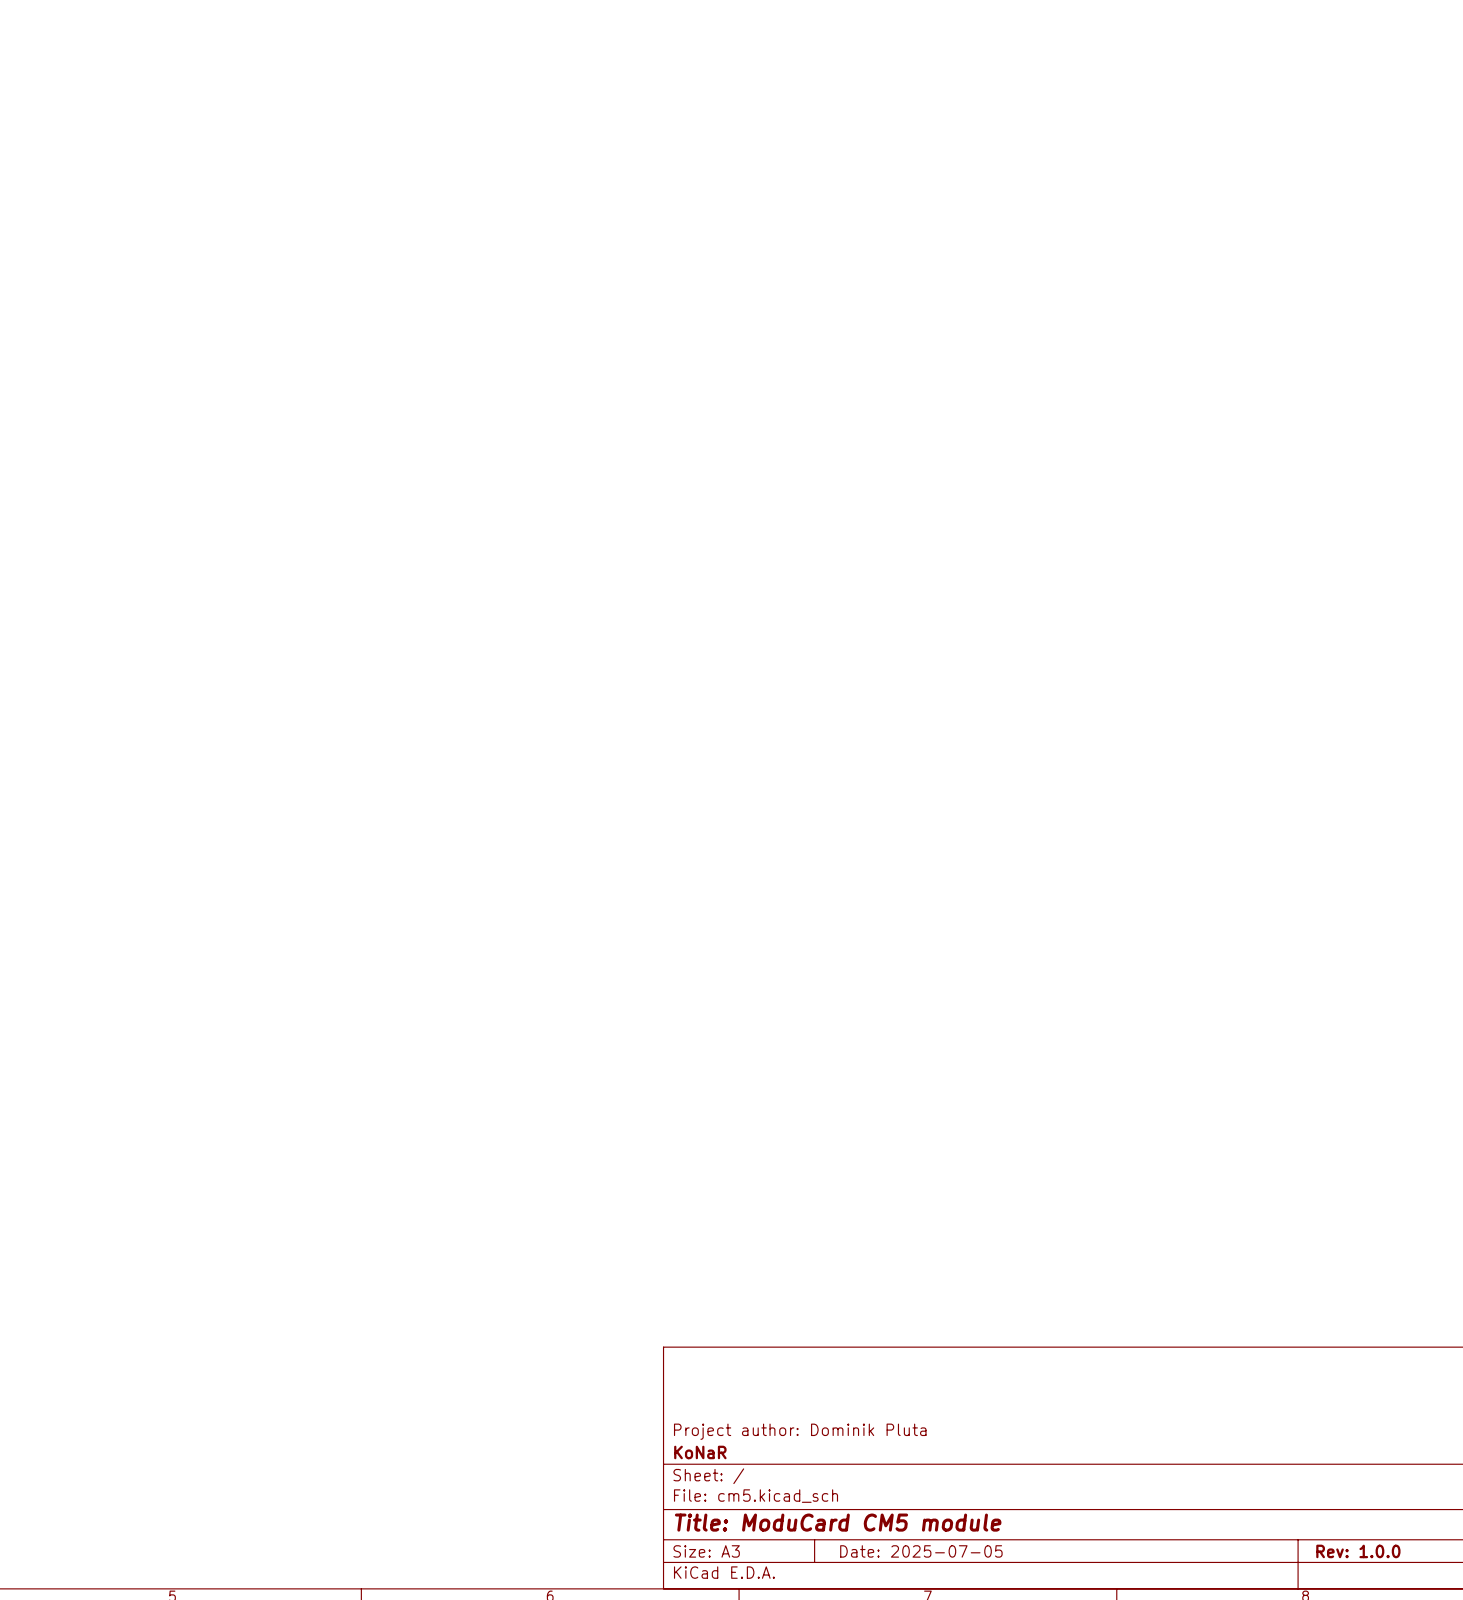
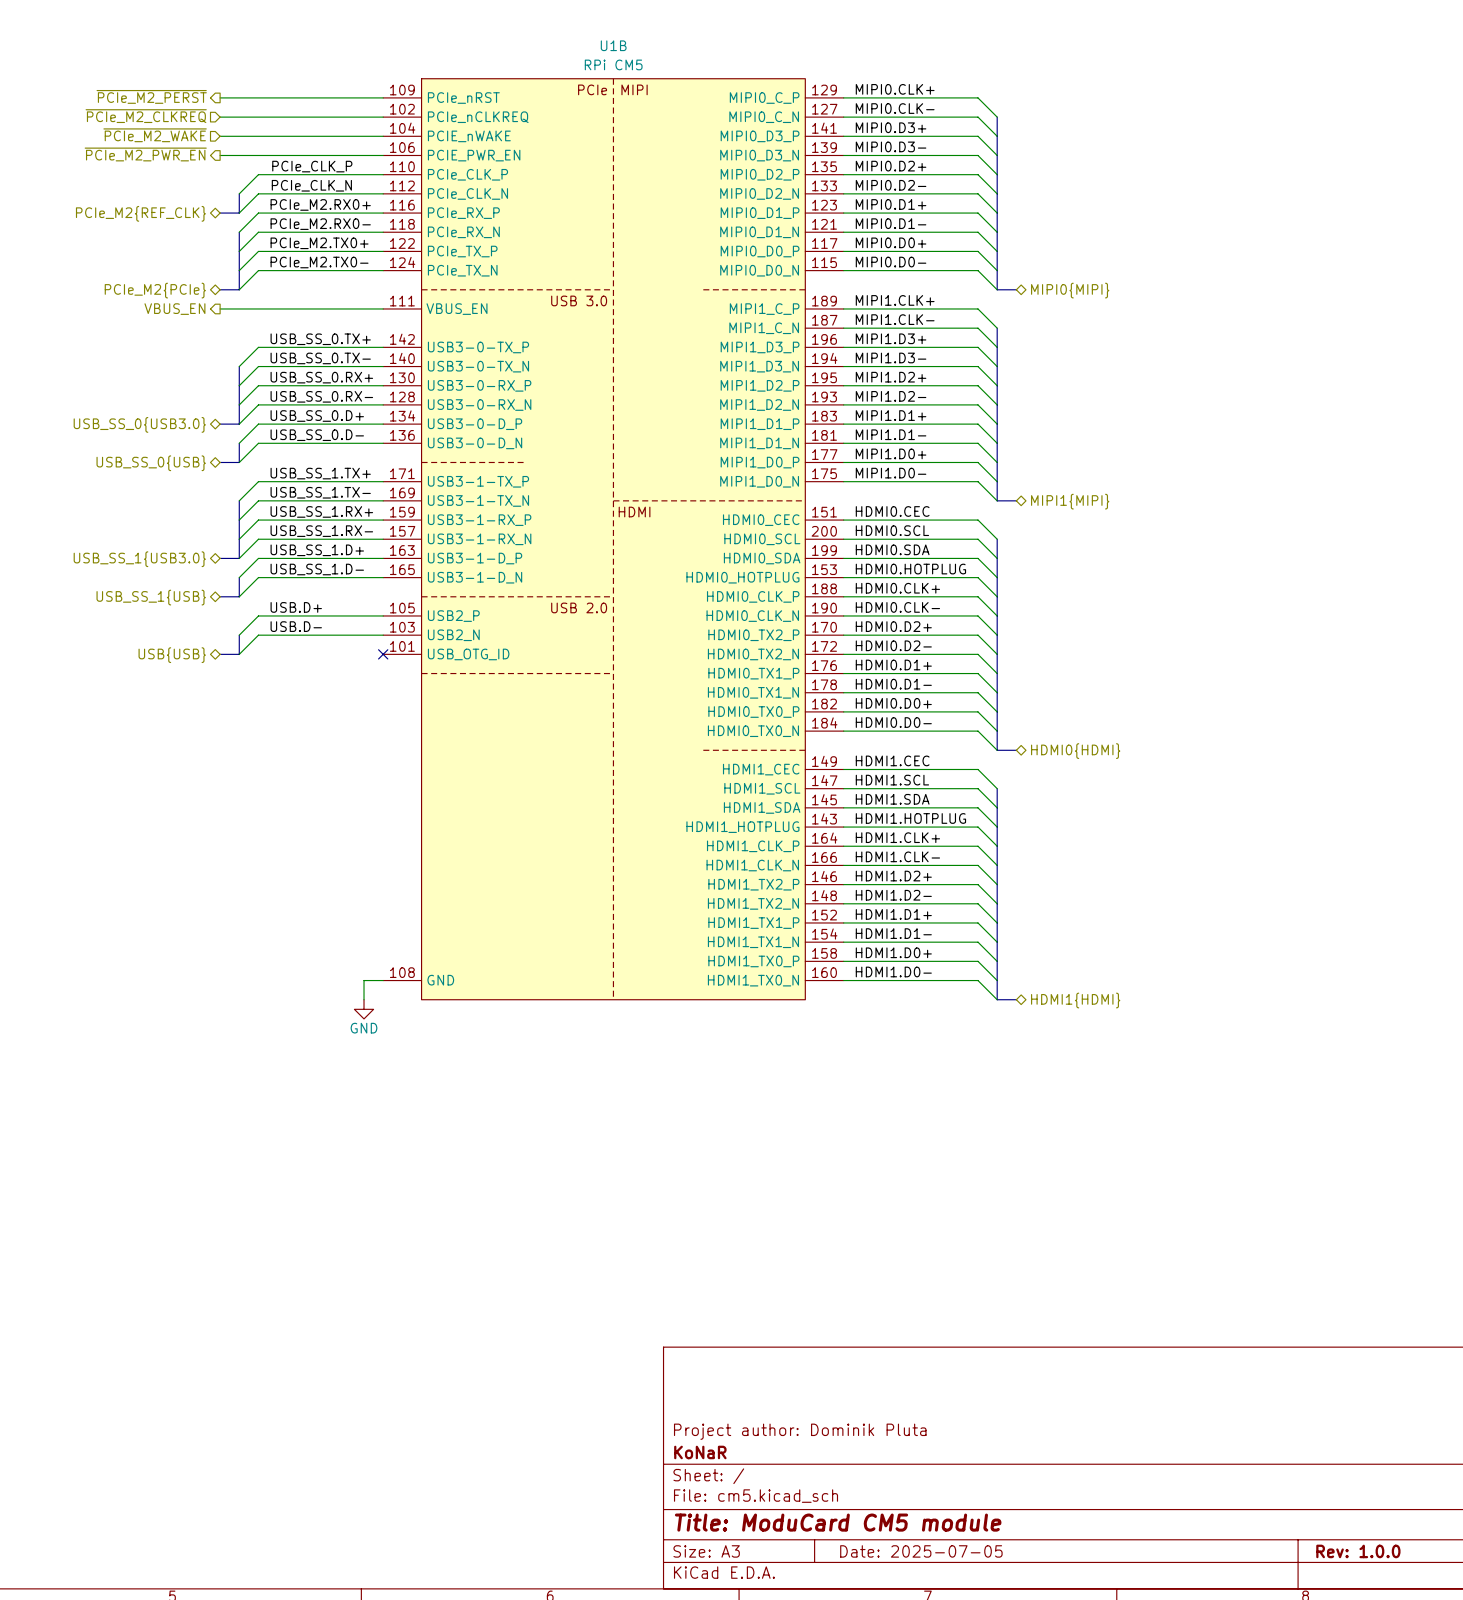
label: none -> MIPI0.CLK+ (895, 89)
hierarchical label: none -> ~{PCIe_M2_PERST} (151, 96)
wire: none -> (220, 97) (383, 97)
wire: none -> (843, 97) (978, 97) (997, 117)
label: none -> MIPI0.CLK- (895, 108)
hierarchical label: none -> ~{PCIe_M2_CLKREQ} (146, 116)
wire: none -> (220, 117) (383, 117)
wire: none -> (843, 117) (978, 117) (997, 136)
bus: none -> (997, 117) (997, 289) (1016, 289)
label: none -> MIPI0.D3+ (891, 127)
hierarchical label: none -> ~{PCIe_M2_WAKE} (155, 135)
wire: none -> (220, 136) (383, 136)
wire: none -> (843, 136) (978, 136) (997, 155)
label: none -> MIPI0.D3- (891, 146)
hierarchical label: none -> ~{PCIe_M2_PWR_EN} (145, 154)
wire: none -> (220, 155) (383, 155)
wire: none -> (843, 155) (978, 155) (997, 174)
label: none -> PCIe_CLK_P (312, 166)
label: none -> MIPI0.D2+ (891, 166)
wire: none -> (383, 174) (258, 174) (239, 193)
wire: none -> (843, 174) (978, 174) (997, 193)
label: none -> PCIe_CLK_N (311, 185)
label: none -> MIPI0.D2- (891, 185)
bus: none -> (239, 193) (239, 213) (220, 213)
wire: none -> (383, 193) (258, 193) (239, 213)
wire: none -> (843, 193) (978, 193) (997, 213)
label: none -> PCIe_M2.RX0+ (320, 204)
label: none -> MIPI0.D1+ (891, 204)
hierarchical label: none -> PCIe_M2{REF_CLK} (140, 213)
wire: none -> (383, 213) (258, 213) (239, 232)
wire: none -> (843, 213) (978, 213) (997, 232)
label: none -> MIPI0.D1- (891, 223)
label: none -> PCIe_M2.RX0- (320, 224)
bus: none -> (239, 232) (239, 289) (220, 289)
wire: none -> (383, 232) (258, 232) (239, 251)
wire: none -> (843, 232) (978, 232) (997, 251)
label: none -> MIPI0.D0+ (891, 242)
label: none -> PCIe_M2.TX0+ (319, 243)
wire: none -> (383, 251) (258, 251) (239, 270)
wire: none -> (843, 251) (978, 251) (997, 270)
label: none -> PCIe_M2.TX0- (319, 262)
label: none -> MIPI0.D0- (891, 262)
wire: none -> (383, 270) (258, 270) (239, 289)
wire: none -> (843, 270) (978, 270) (997, 289)
hierarchical label: none -> PCIe_M2{PCIe} (155, 290)
hierarchical label: none -> MIPI0{MIPI} (1070, 290)
label: none -> MIPI1.CLK+ (895, 300)
wire: none -> (220, 308) (383, 308)
wire: none -> (843, 308) (978, 308) (997, 328)
hierarchical label: none -> VBUS_EN (174, 309)
label: none -> MIPI1.CLK- (895, 319)
wire: none -> (843, 328) (978, 328) (997, 347)
bus: none -> (997, 328) (997, 500) (1016, 500)
label: none -> MIPI1.D3+ (891, 338)
label: none -> USB_SS_0.TX+ (320, 339)
wire: none -> (383, 347) (258, 347) (239, 366)
wire: none -> (843, 347) (978, 347) (997, 366)
label: none -> MIPI1.D3- (891, 357)
label: none -> USB_SS_0.TX- (320, 358)
bus: none -> (239, 366) (239, 424) (220, 424)
wire: none -> (383, 366) (258, 366) (239, 385)
wire: none -> (843, 366) (978, 366) (997, 385)
label: none -> USB_SS_0.RX+ (321, 377)
label: none -> MIPI1.D2+ (891, 377)
wire: none -> (383, 385) (258, 385) (239, 404)
wire: none -> (843, 385) (978, 385) (997, 404)
label: none -> USB_SS_0.RX- (321, 396)
label: none -> MIPI1.D2- (891, 396)
wire: none -> (383, 404) (258, 404) (239, 424)
wire: none -> (843, 404) (978, 404) (997, 424)
label: none -> MIPI1.D1+ (891, 415)
label: none -> USB_SS_0.D+ (317, 416)
hierarchical label: none -> USB_SS_0{USB3.0} (139, 424)
wire: none -> (383, 424) (258, 424) (239, 443)
wire: none -> (843, 424) (978, 424) (997, 443)
label: none -> MIPI1.D1- (891, 434)
label: none -> USB_SS_0.D- (317, 435)
bus: none -> (239, 443) (239, 462) (220, 462)
wire: none -> (383, 443) (258, 443) (239, 462)
wire: none -> (843, 443) (978, 443) (997, 462)
label: none -> MIPI1.D0+ (891, 453)
wire: none -> (843, 462) (978, 462) (997, 481)
hierarchical label: none -> USB_SS_0{USB} (151, 463)
label: none -> USB_SS_1.TX+ (320, 473)
label: none -> MIPI1.D0- (891, 473)
wire: none -> (383, 481) (258, 481) (239, 500)
wire: none -> (843, 481) (978, 481) (997, 500)
label: none -> USB_SS_1.TX- (320, 492)
bus: none -> (239, 500) (239, 558) (220, 558)
wire: none -> (383, 500) (258, 500) (239, 520)
hierarchical label: none -> MIPI1{MIPI} (1070, 501)
label: none -> USB_SS_1.RX+ (321, 511)
label: none -> HDMI0.CEC (892, 511)
wire: none -> (383, 520) (258, 520) (239, 539)
wire: none -> (843, 520) (978, 520) (997, 539)
label: none -> HDMI0.SCL (892, 530)
label: none -> USB_SS_1.RX- (321, 531)
wire: none -> (383, 539) (258, 539) (239, 558)
U1B: none -> RPi CM5 (613, 539)
wire: none -> (843, 539) (978, 539) (997, 558)
bus: none -> (997, 539) (997, 750) (1016, 750)
label: none -> HDMI0.SDA (892, 549)
label: none -> USB_SS_1.D+ (317, 550)
wire: none -> (383, 558) (258, 558) (239, 577)
wire: none -> (843, 558) (978, 558) (997, 577)
hierarchical label: none -> USB_SS_1{USB3.0} (139, 559)
label: none -> USB_SS_1.D- (317, 569)
label: none -> HDMI0.HOTPLUG (910, 569)
bus: none -> (239, 577) (239, 596) (220, 596)
wire: none -> (383, 577) (258, 577) (239, 596)
wire: none -> (843, 577) (978, 577) (997, 596)
label: none -> HDMI0.CLK+ (897, 588)
wire: none -> (843, 596) (978, 596) (997, 615)
hierarchical label: none -> USB_SS_1{USB} (151, 597)
label: none -> USB.D+ (296, 607)
label: none -> HDMI0.CLK- (897, 607)
wire: none -> (383, 615) (258, 615) (239, 635)
wire: none -> (843, 615) (978, 615) (997, 635)
label: none -> USB.D- (296, 626)
label: none -> HDMI0.D2+ (893, 626)
bus: none -> (239, 635) (239, 654) (220, 654)
wire: none -> (383, 635) (258, 635) (239, 654)
wire: none -> (843, 635) (978, 635) (997, 654)
label: none -> HDMI0.D2- (893, 645)
no-connect mark: none -> (383, 654)
wire: none -> (843, 654) (978, 654) (997, 673)
hierarchical label: none -> USB{USB} (172, 655)
label: none -> HDMI0.D1+ (893, 664)
wire: none -> (843, 673) (978, 673) (997, 692)
label: none -> HDMI0.D1- (893, 684)
wire: none -> (843, 692) (978, 692) (997, 711)
label: none -> HDMI0.D0+ (893, 703)
wire: none -> (843, 711) (978, 711) (997, 731)
label: none -> HDMI0.D0- (893, 722)
wire: none -> (843, 731) (978, 731) (997, 750)
hierarchical label: none -> HDMI0{HDMI} (1075, 751)
label: none -> HDMI1.CEC (892, 760)
wire: none -> (843, 769) (978, 769) (997, 788)
label: none -> HDMI1.SCL (892, 780)
wire: none -> (843, 788) (978, 788) (997, 807)
bus: none -> (997, 788) (997, 999) (1016, 999)
label: none -> HDMI1.SDA (892, 799)
wire: none -> (843, 807) (978, 807) (997, 827)
label: none -> HDMI1.HOTPLUG (910, 818)
wire: none -> (843, 827) (978, 827) (997, 846)
label: none -> HDMI1.CLK+ (897, 837)
wire: none -> (843, 846) (978, 846) (997, 865)
label: none -> HDMI1.CLK- (897, 856)
wire: none -> (843, 865) (978, 865) (997, 884)
label: none -> HDMI1.D2+ (893, 876)
wire: none -> (843, 884) (978, 884) (997, 903)
label: none -> HDMI1.D2- (893, 895)
wire: none -> (843, 903) (978, 903) (997, 922)
label: none -> HDMI1.D1+ (893, 914)
wire: none -> (843, 922) (978, 922) (997, 942)
label: none -> HDMI1.D1- (893, 933)
wire: none -> (843, 942) (978, 942) (997, 961)
label: none -> HDMI1.D0+ (893, 952)
wire: none -> (843, 961) (978, 961) (997, 980)
label: none -> HDMI1.D0- (893, 971)
wire: none -> (383, 980) (364, 980) (364, 999)
wire: none -> (843, 980) (978, 980) (997, 999)
hierarchical label: none -> HDMI1{HDMI} (1075, 1000)
power symbol: none -> GND (364, 1009)

